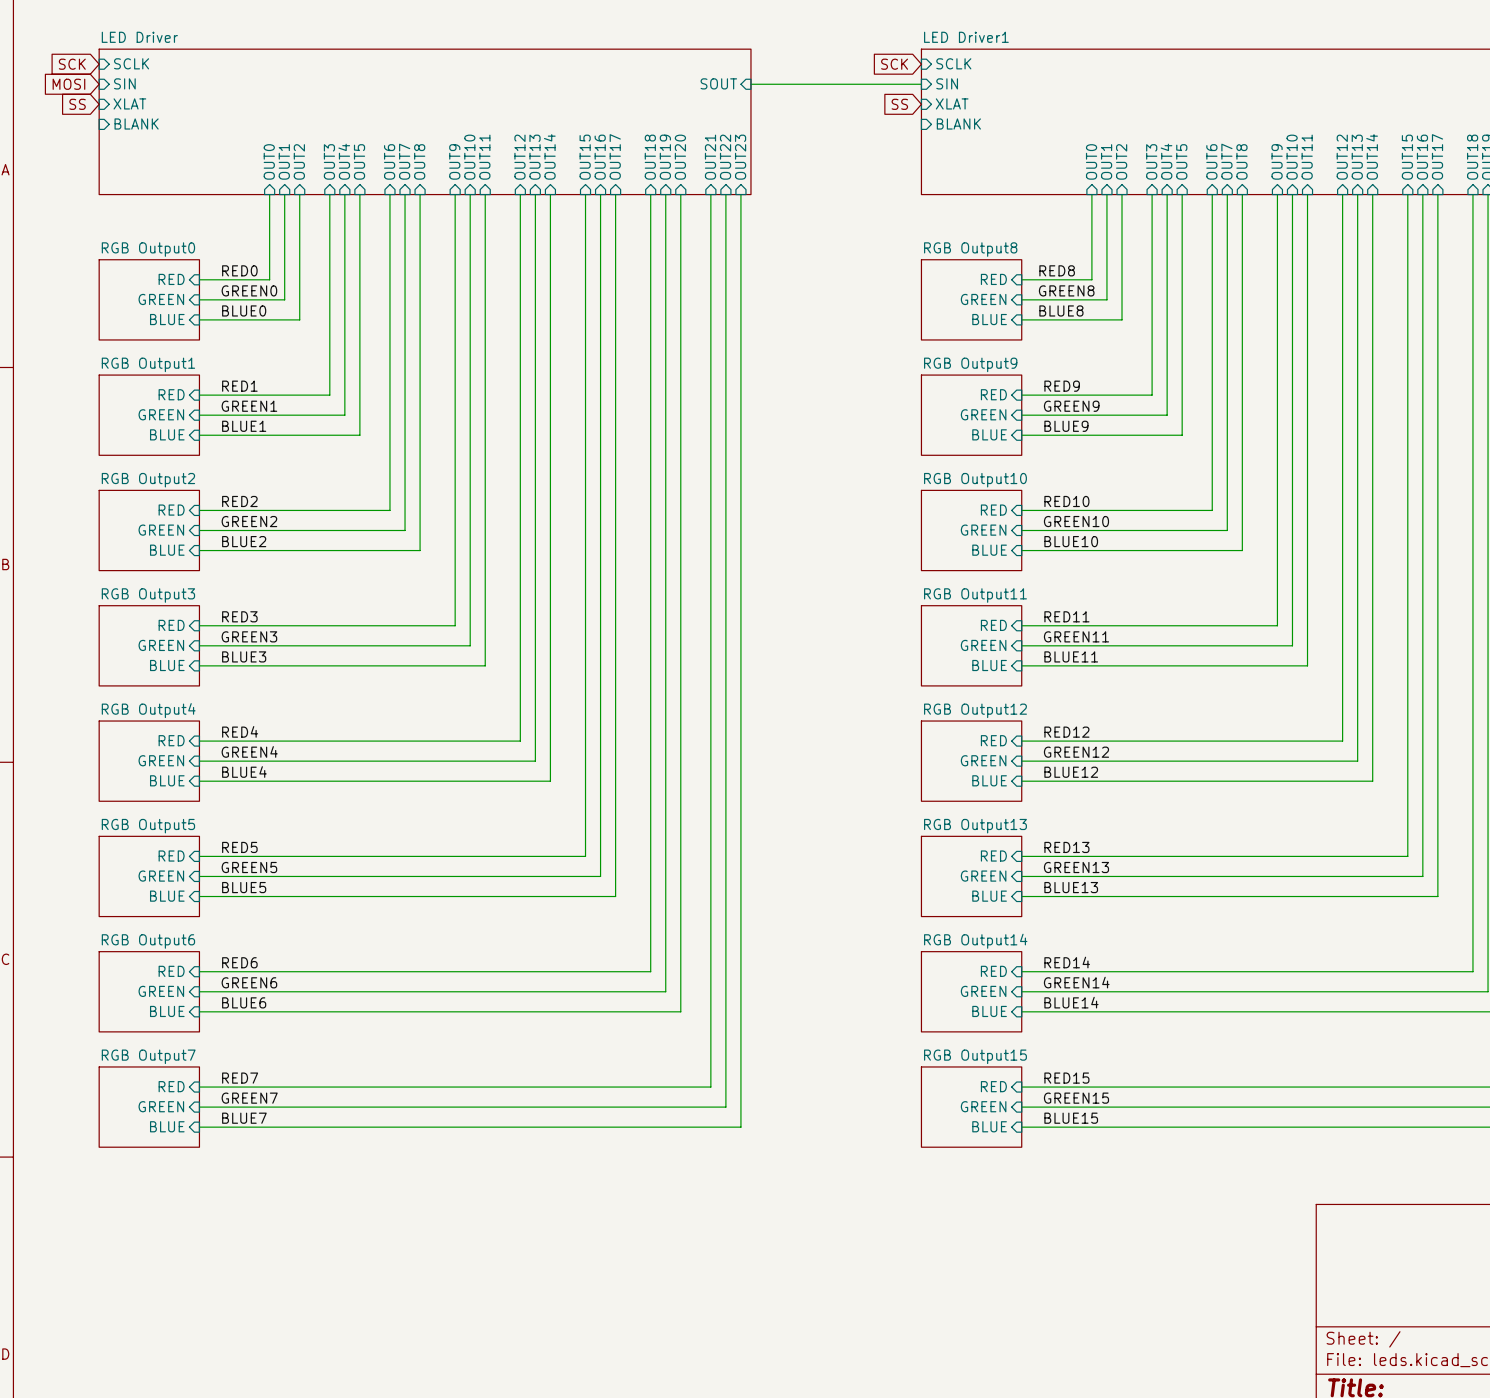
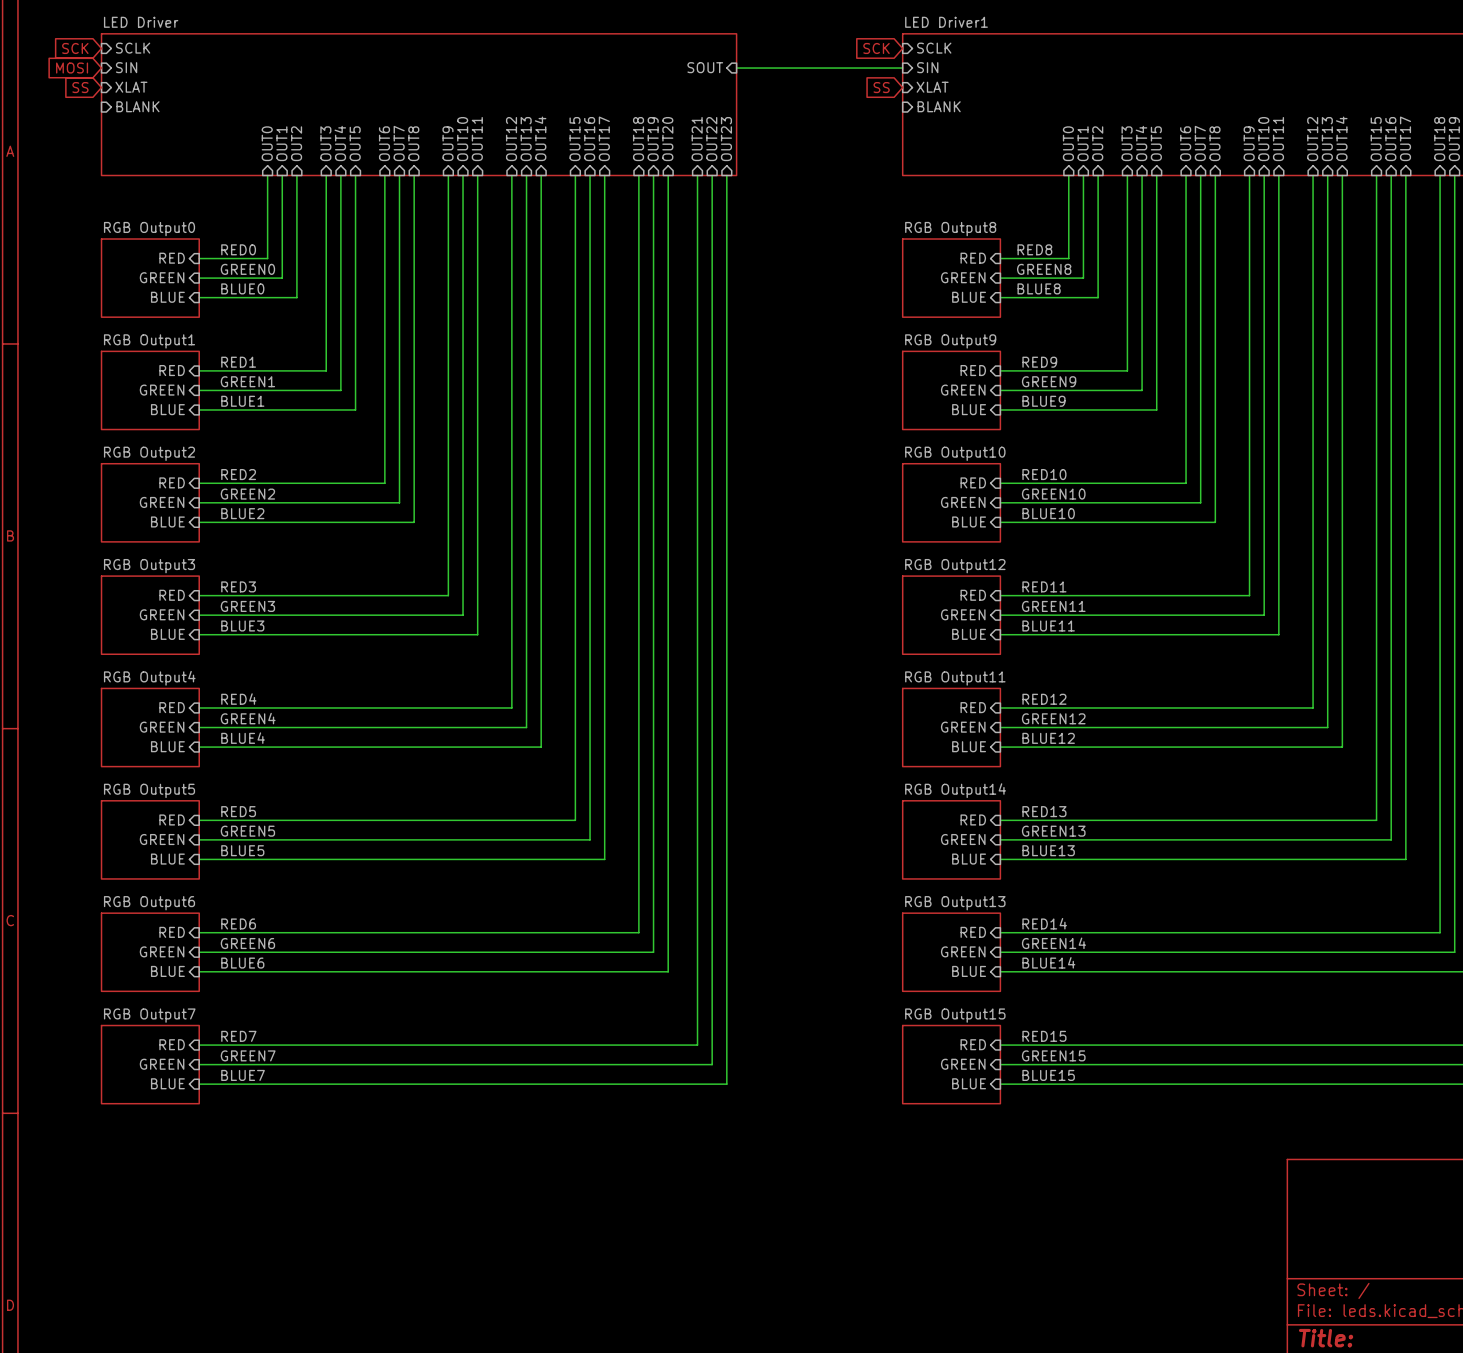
sheet RGB Output11 name: RGB Output11 (975, 595) -> RGB Output12 (955, 566)
sheet RGB Output12 name: RGB Output12 (975, 710) -> RGB Output11 (955, 678)
sheet RGB Output13 name: RGB Output13 (975, 826) -> RGB Output14 (955, 790)
sheet RGB Output14 name: RGB Output14 (975, 941) -> RGB Output13 (955, 903)

